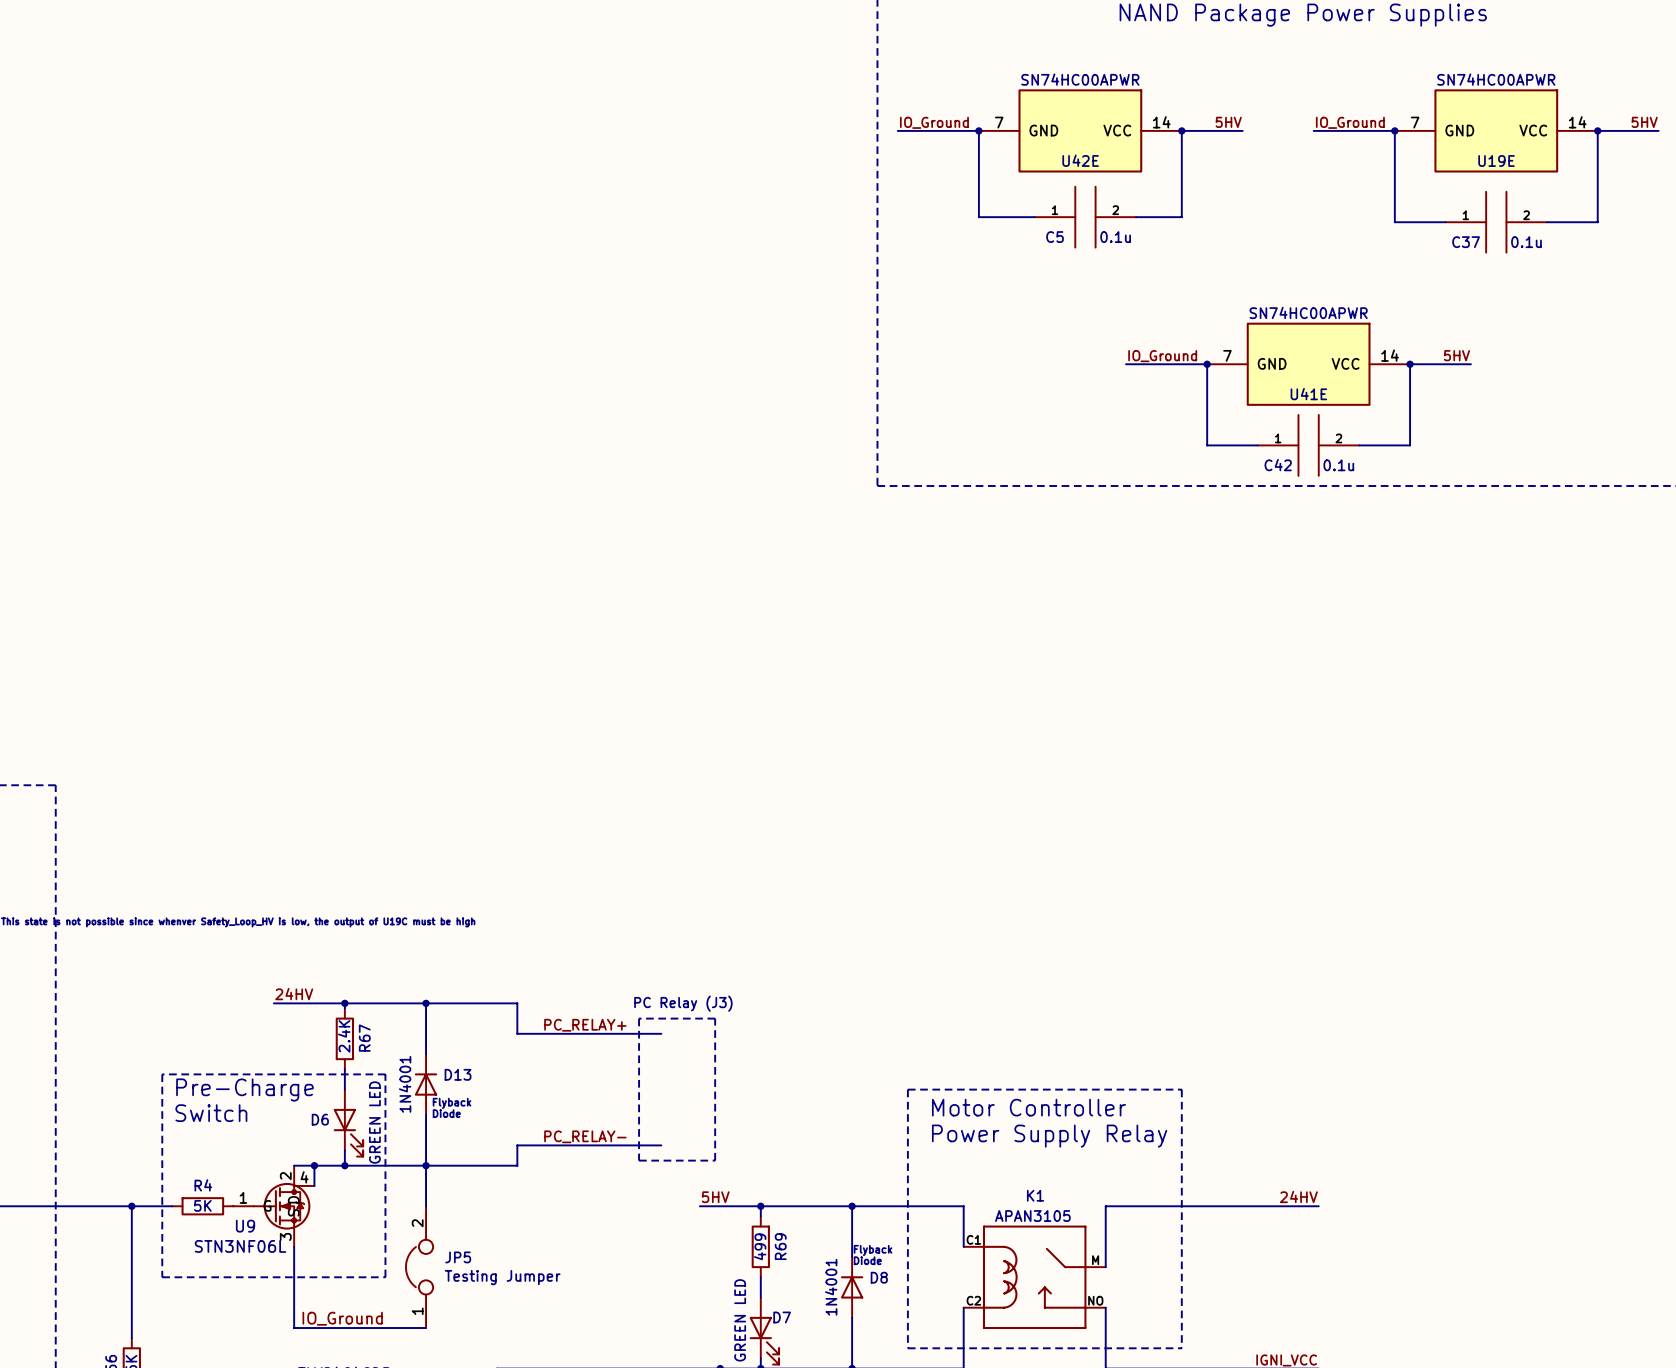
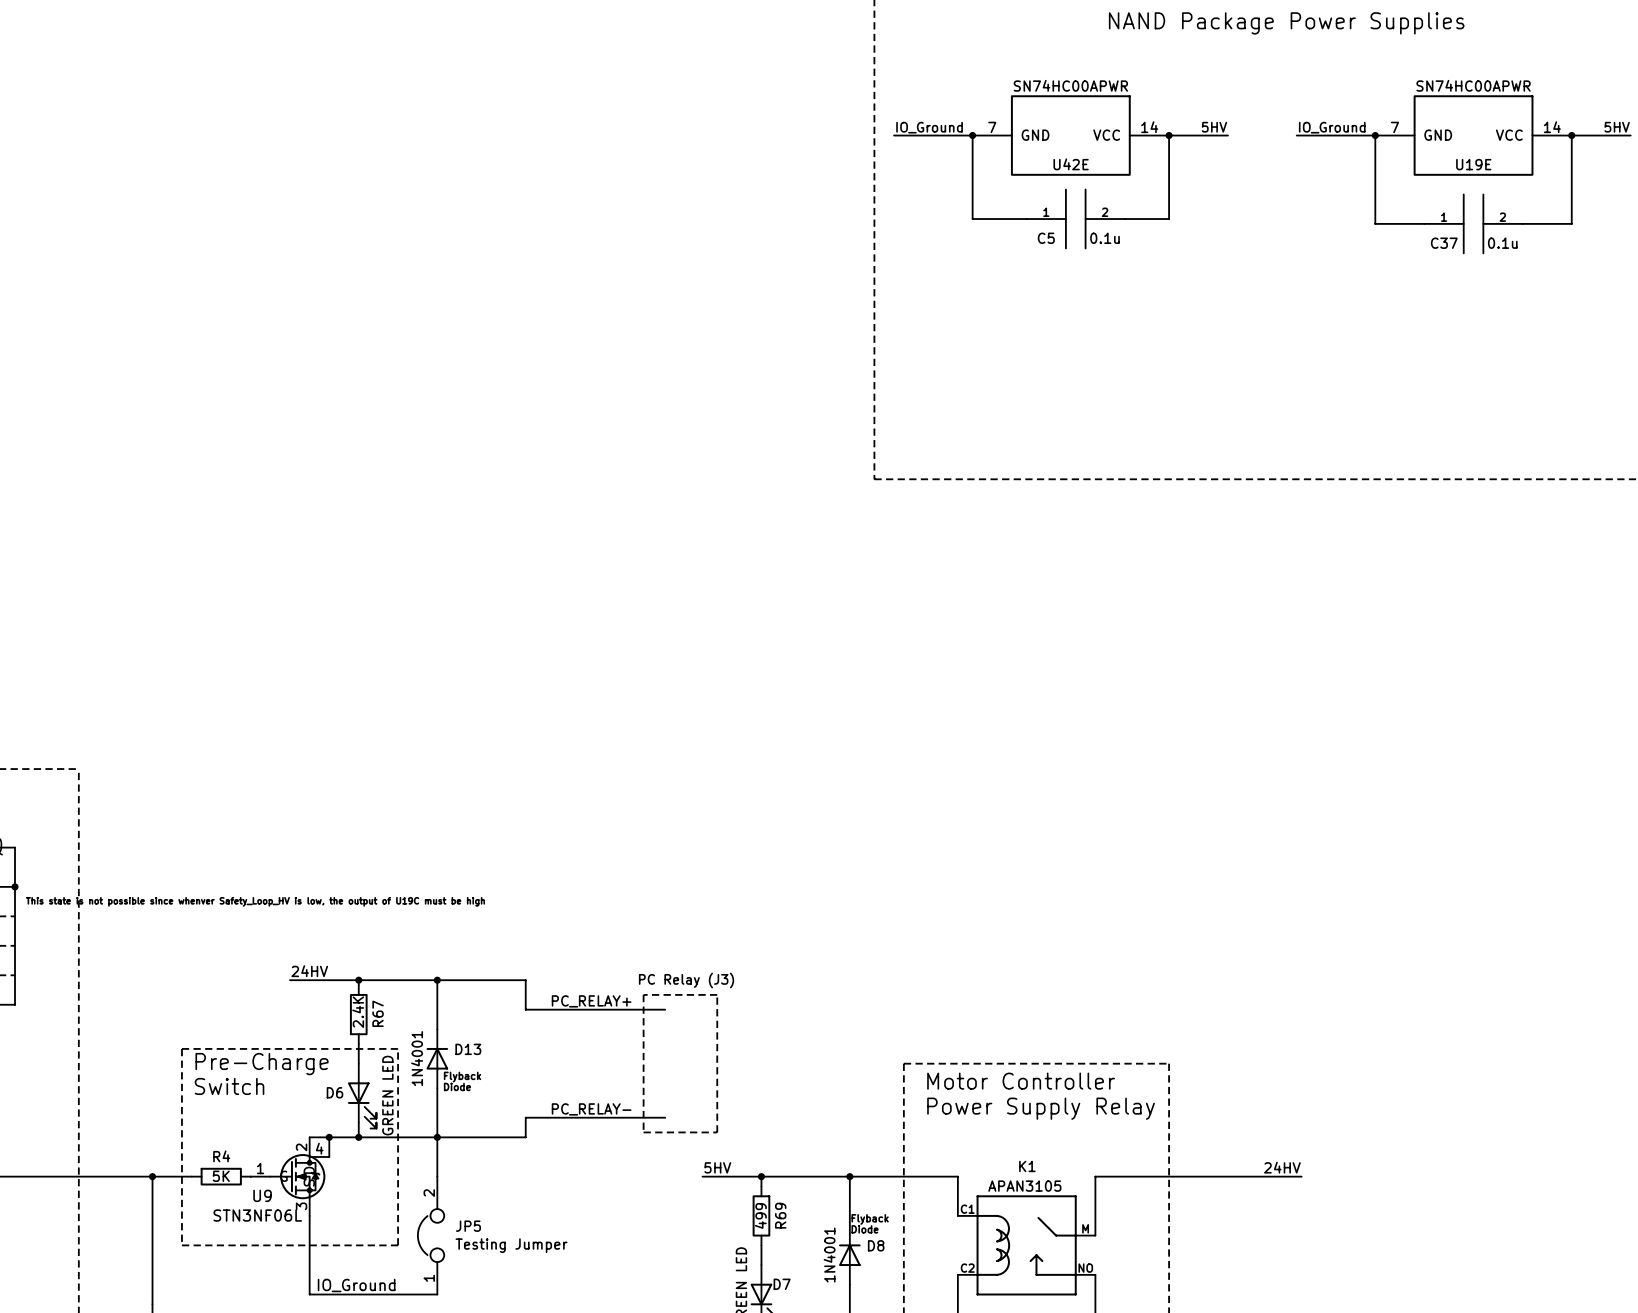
label: 5HV (1456, 355) -> none
label: IO_Ground (1162, 356) -> none
wire: (1126, 364) (1207, 364) (1207, 445) (1257, 445) -> none
junction: (1207, 364) -> none
U41E: SN74HC00APWR (1308, 364) -> none
junction: (1410, 364) -> none
wire: (1470, 364) (1410, 364) (1410, 445) (1359, 445) -> none
C42: 0.1u (1308, 445) -> none

